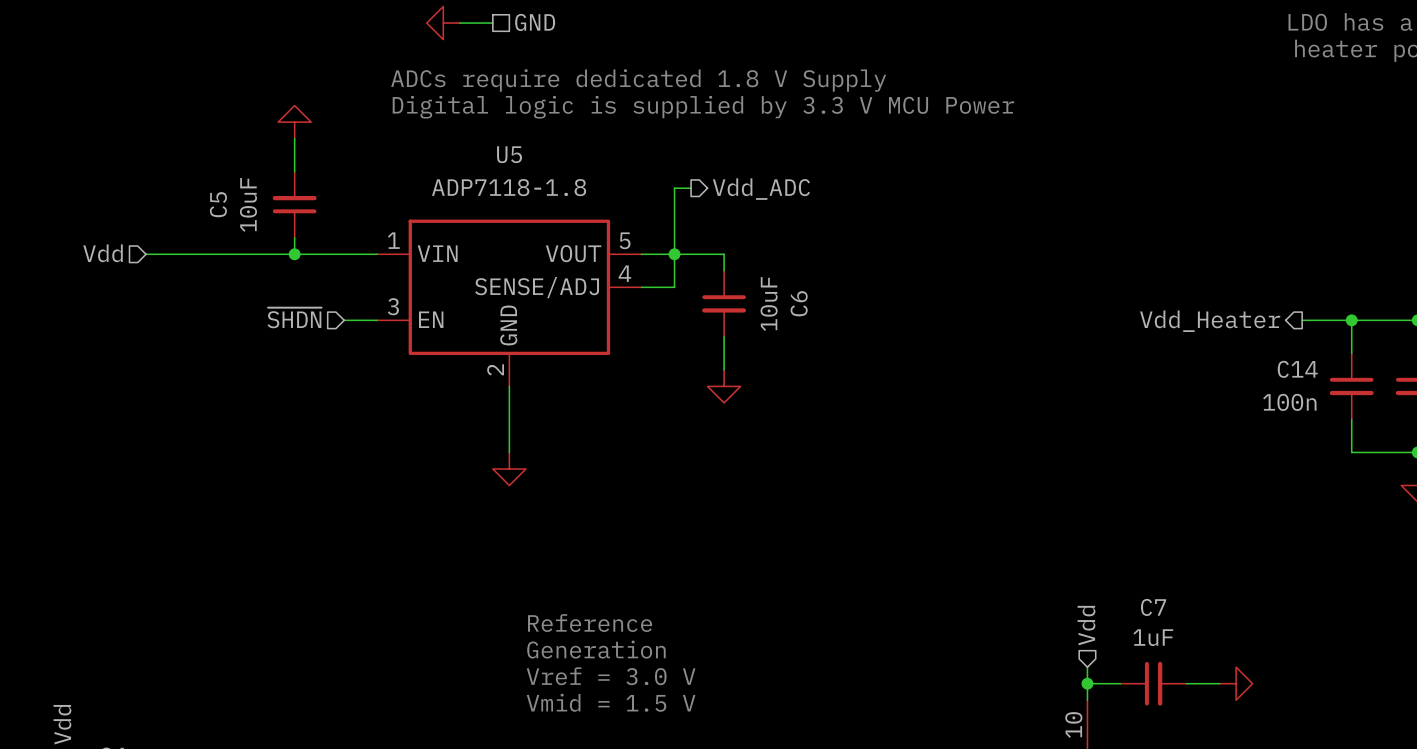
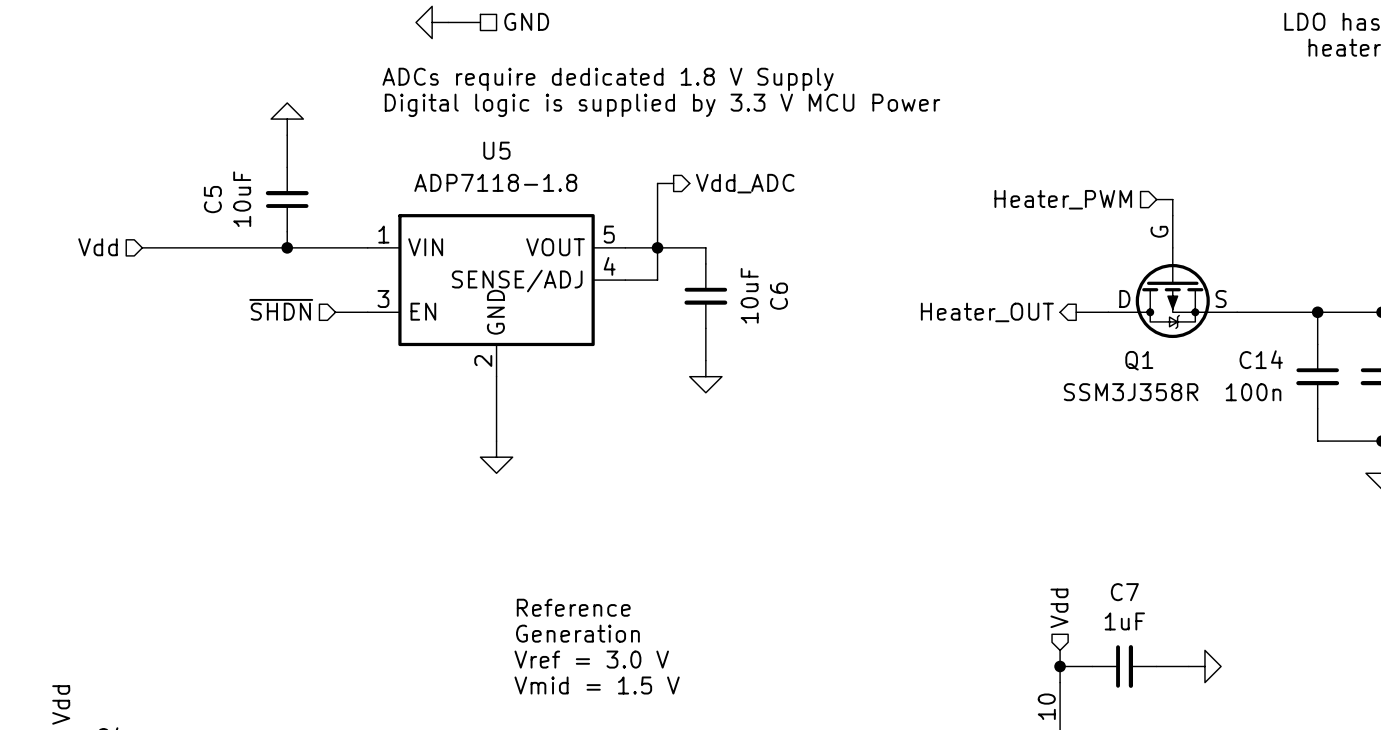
wire: none -> (1156, 199) (1172, 199) (1172, 215)
hierarchical label: none -> Heater_PWM (1063, 199)
Q1: none -> SSM3J358R (1172, 276)
wire: none -> (1076, 312) (1108, 312)
wire: none -> (1237, 312) (1269, 312)
hierarchical label: none -> Heater_OUT (987, 312)
hierarchical label: Vdd_Heater (1210, 321) -> none

